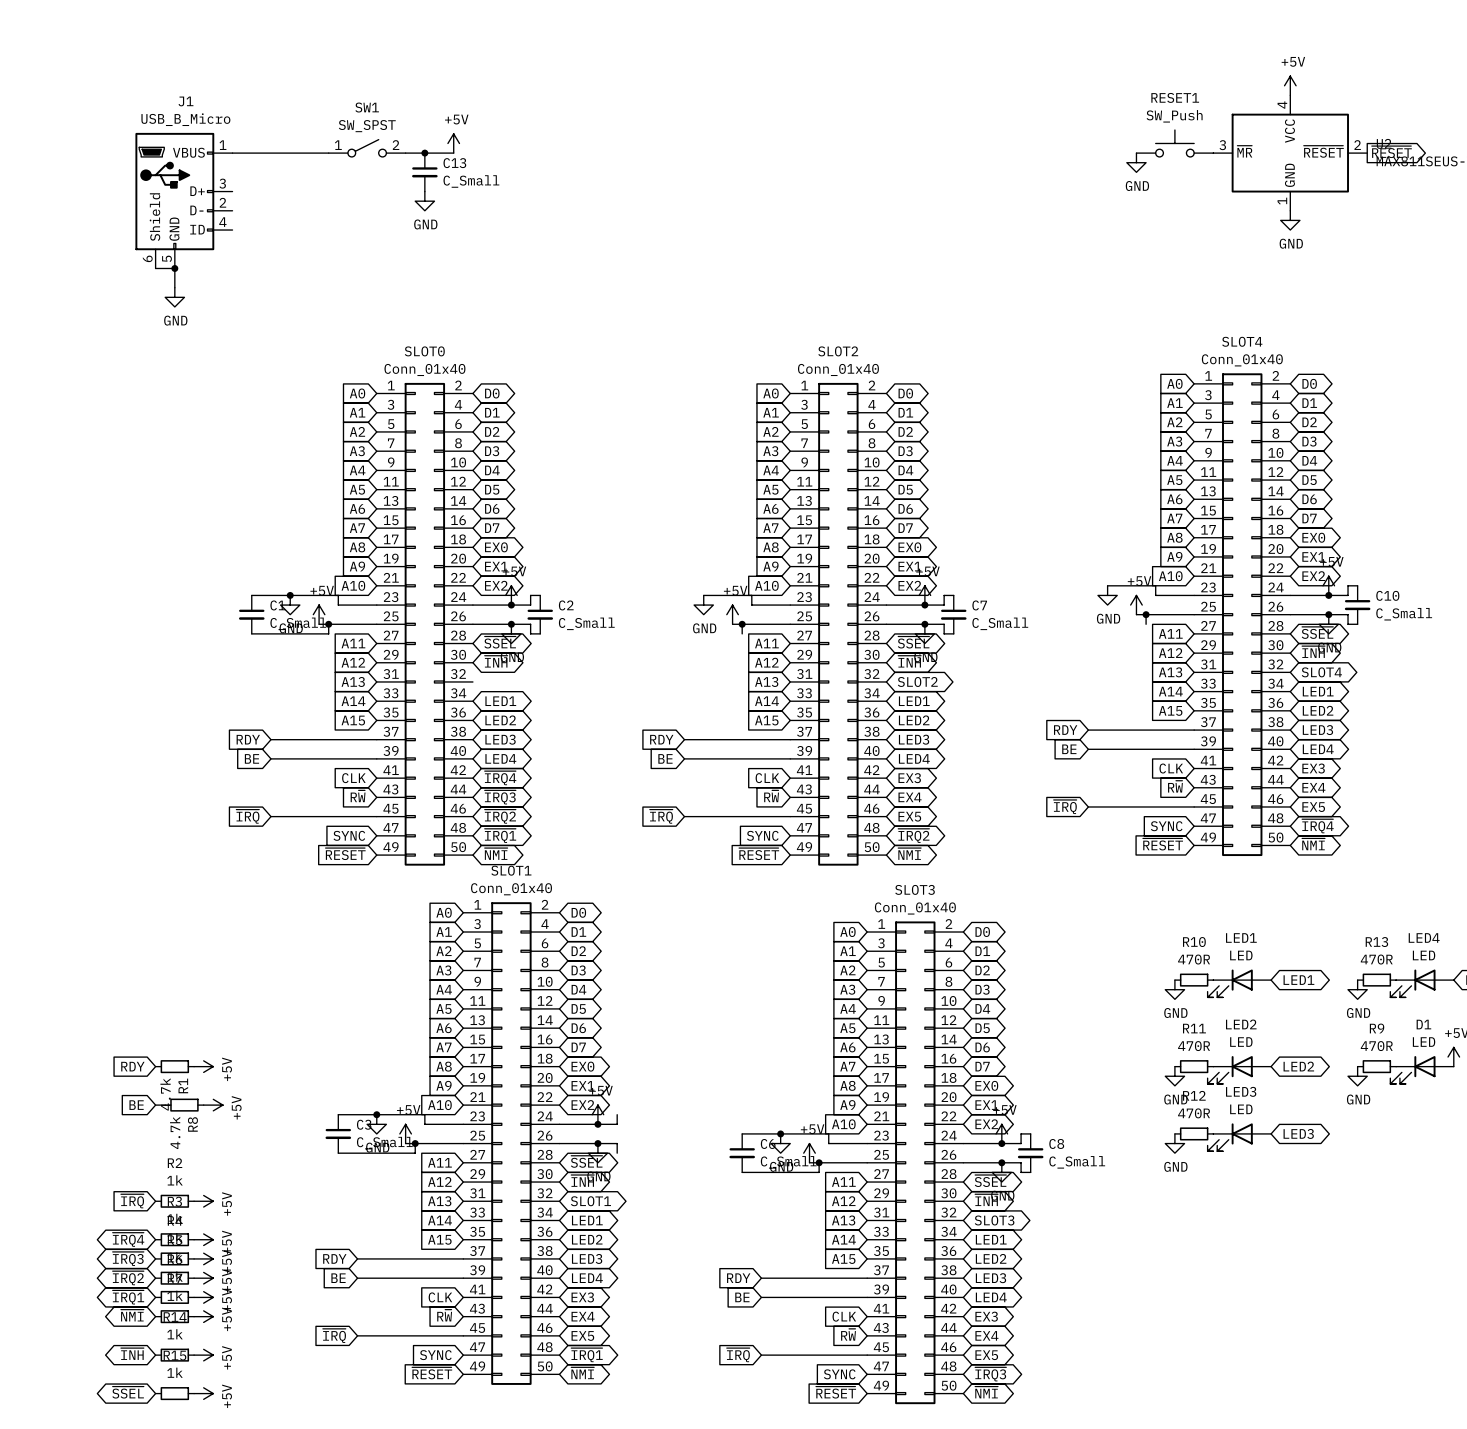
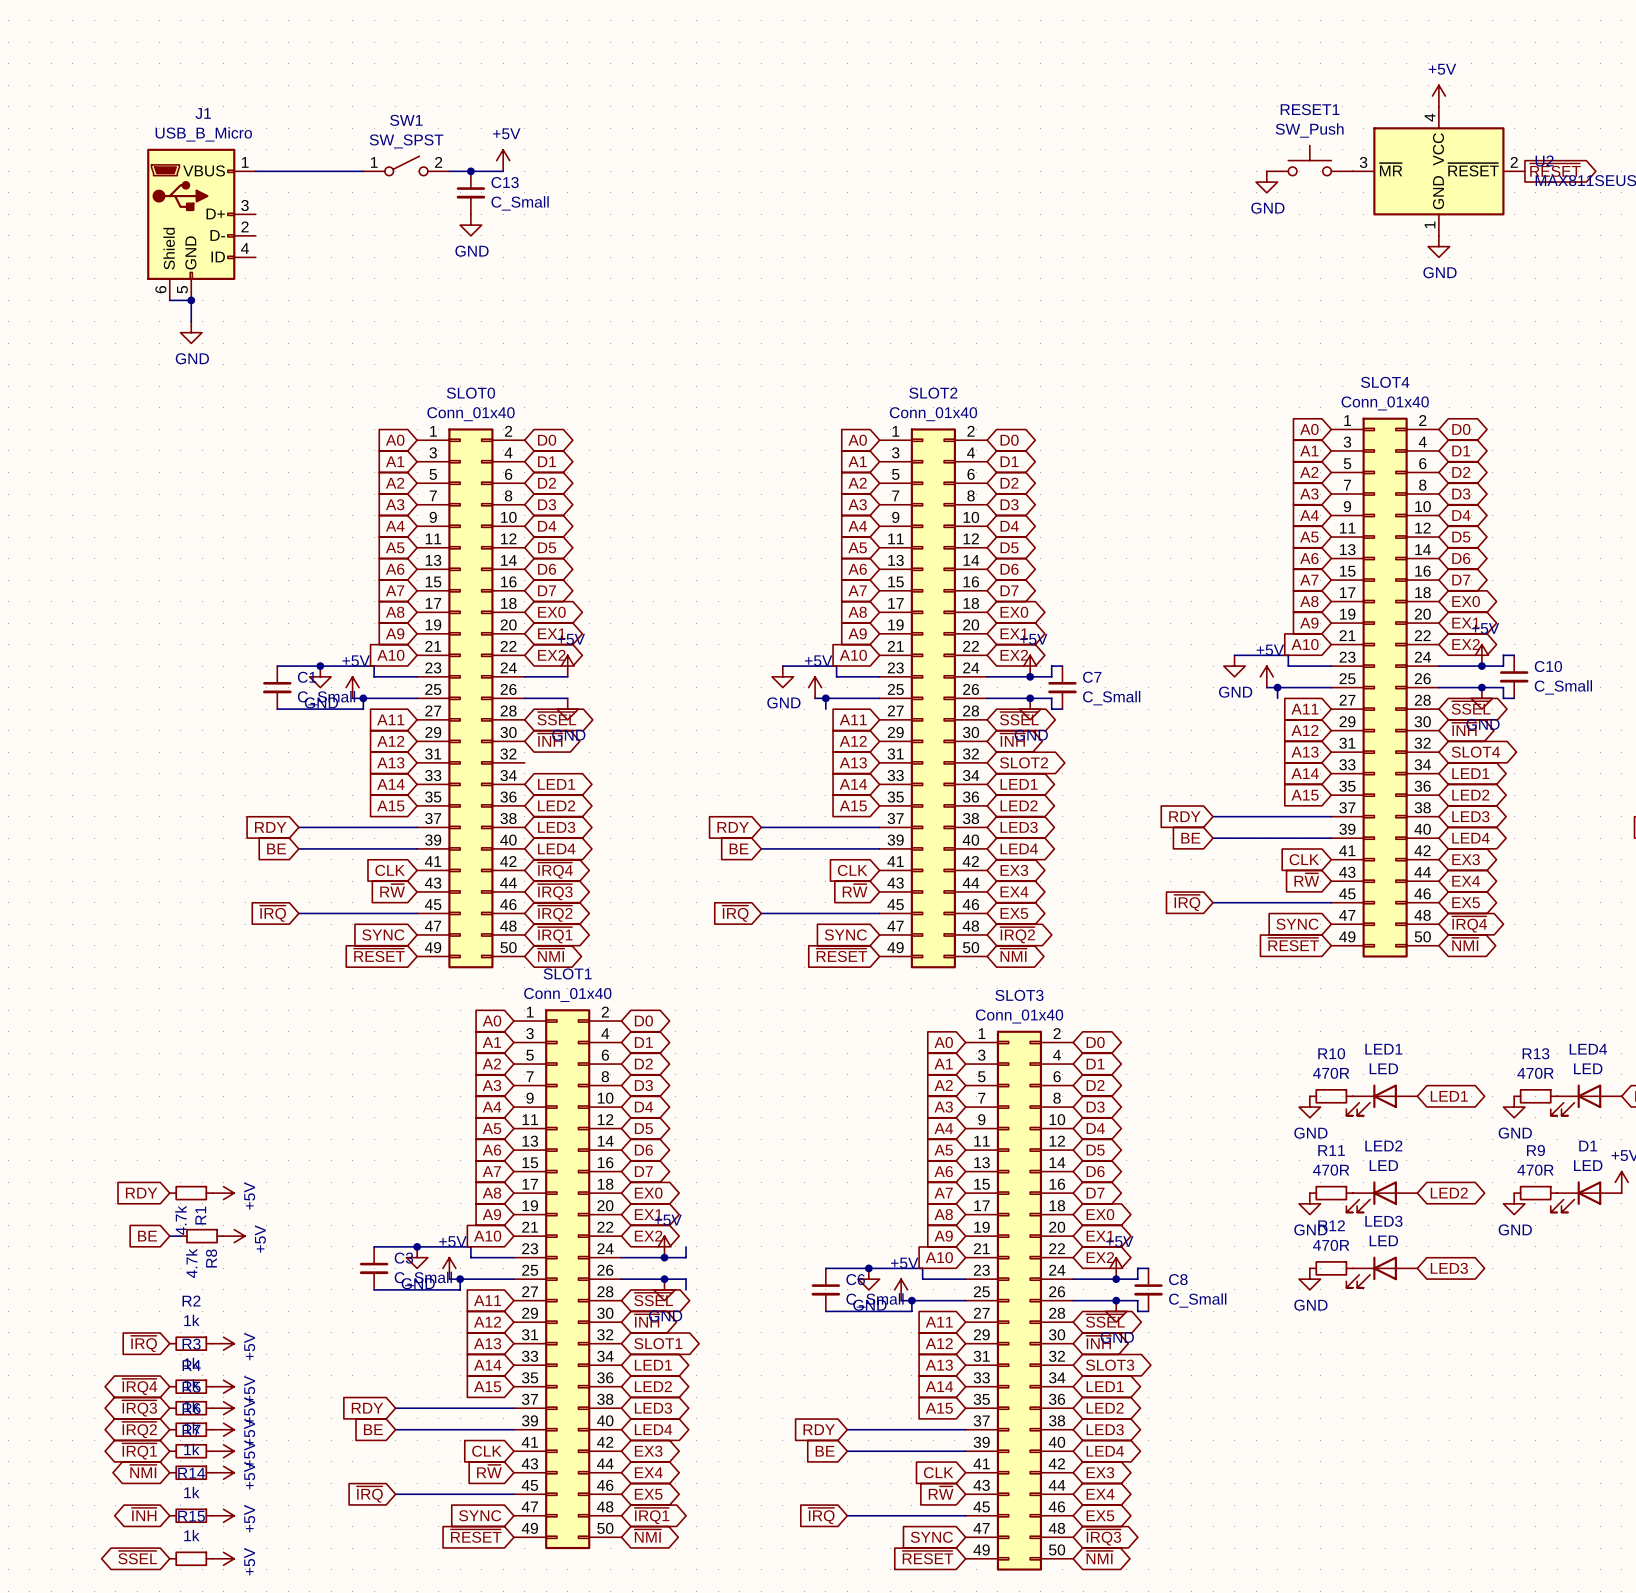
wire: (540, 595) (530, 595) (530, 605) (511, 605) -> none
junction: (511, 605) -> none
C2: C_Small (540, 614) -> none
wire: (511, 624) (530, 624) (530, 633) (540, 633) -> none
junction: (511, 624) -> none

